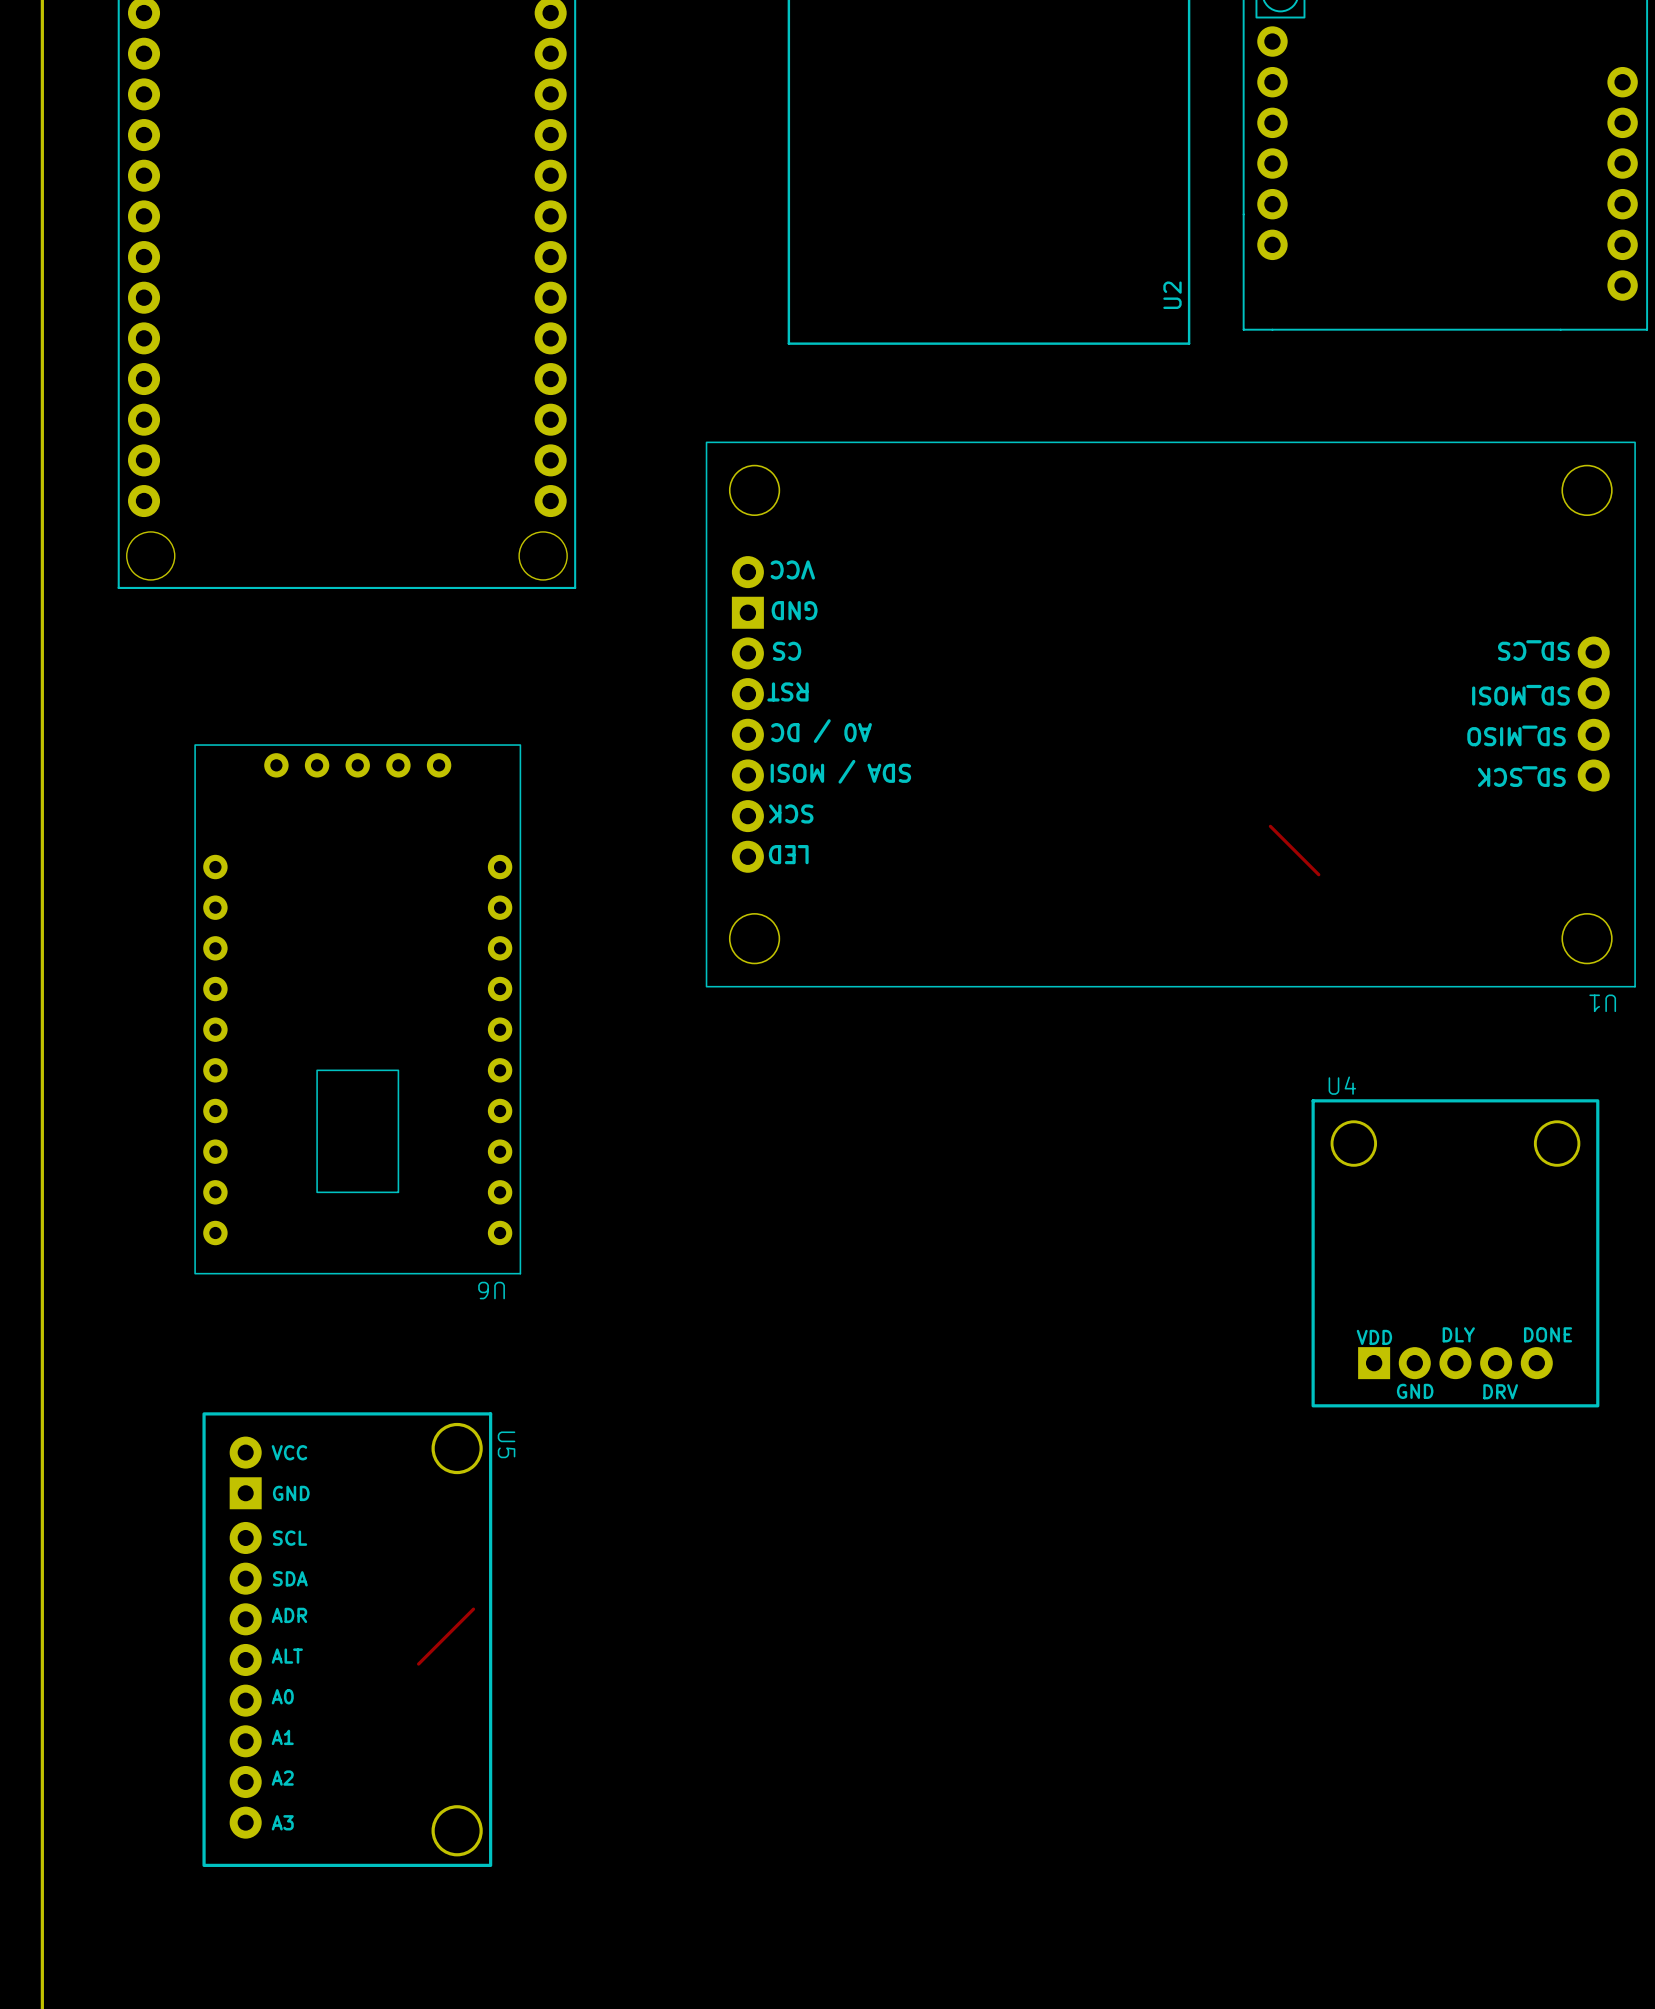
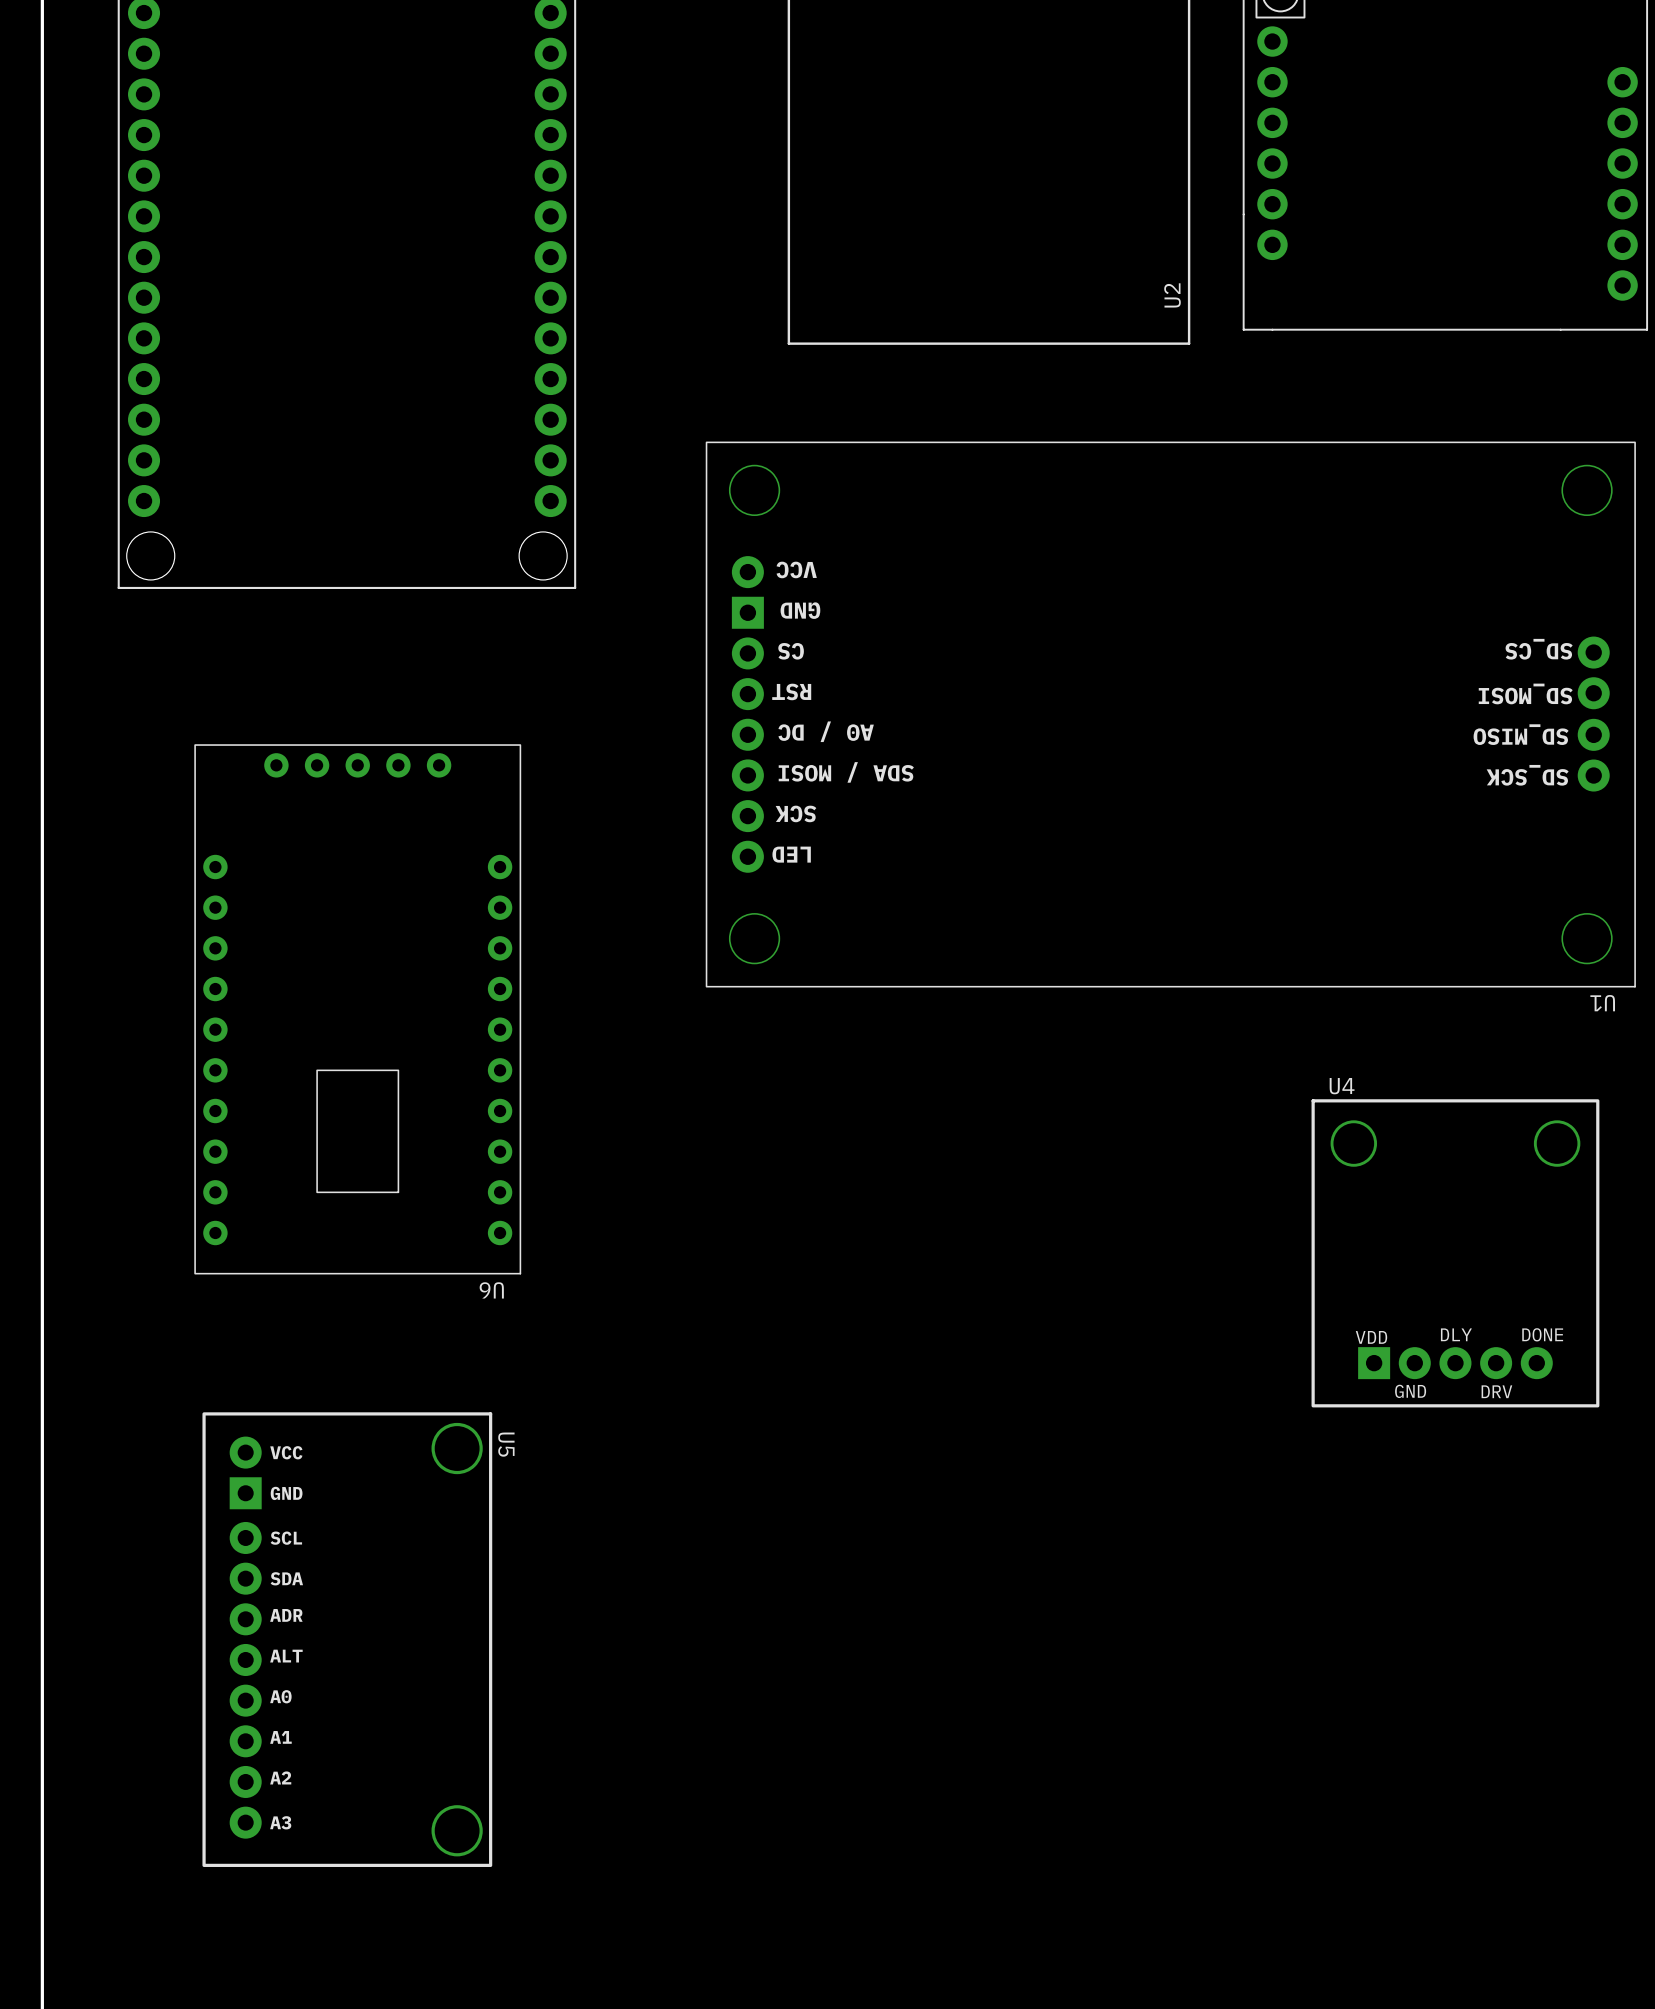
top track: (1270, 826) (1318, 874) -> none
top track: (473, 1609) (418, 1664) -> none

